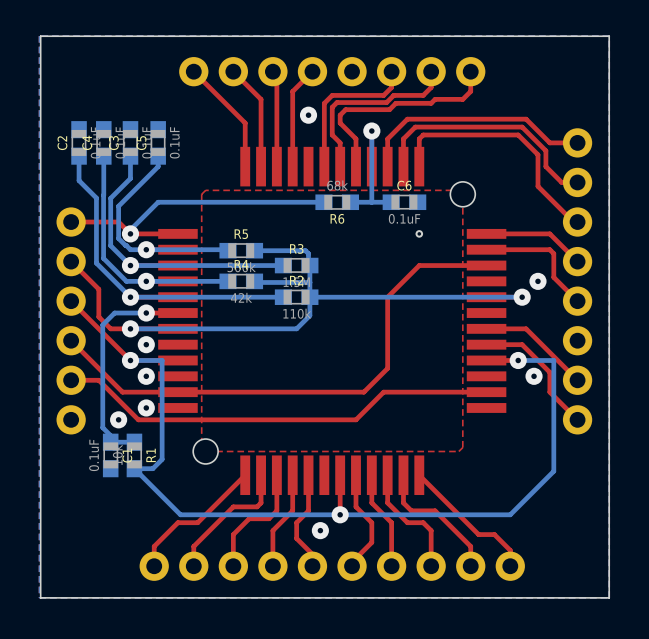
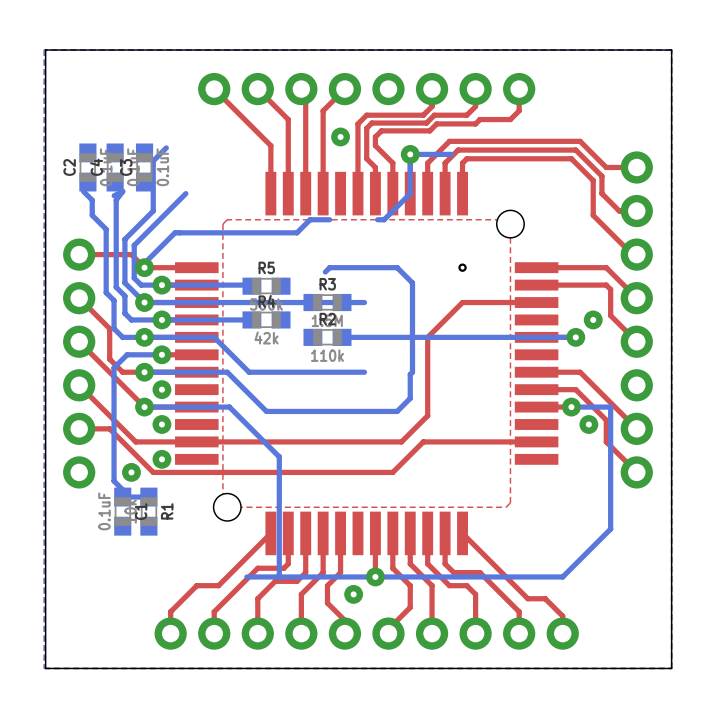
bottom track: none -> (451, 154) (410, 154)
C5: 0.1uF (158, 142) -> none
bottom track: (79, 156) (79, 180) (96, 198) (96, 263) (130, 297) -> (83, 191) (92, 200) (92, 215) (106, 229) (106, 292) (114, 300) (114, 328) (122, 337) (144, 337)
bottom track: (103, 156) (103, 195) -> none
bottom track: (130, 156) (130, 178) (110, 198) (110, 245) (112, 247) -> (166, 147) (153, 161) (153, 211) (124, 239) (124, 282)
bottom track: (158, 156) (158, 166) (118, 206) (118, 238) (130, 249) -> (185, 193) (134, 245) (134, 278) (141, 285) (144, 285)
bottom track: (371, 166) (371, 202) -> (410, 193) (384, 219) (377, 219)
bottom track: (103, 195) (103, 258) (126, 281) -> (114, 195) (122, 191) (116, 200) (116, 287) (124, 295) (124, 313) (131, 319) (140, 319)
bottom track: (323, 202) (268, 202) -> (329, 219) (310, 219) (297, 232)
R6: 68k (337, 202) -> none
bottom track: (391, 202) (350, 202) -> none
C6: 0.1uF (404, 202) -> none
bottom track: none -> (325, 272) (329, 267) (397, 267) (412, 282) (412, 372) (410, 374) (410, 398) (397, 411) (266, 411) (227, 372)
bottom track: (254, 250) (305, 250) (308, 253) (309, 315) (296, 328) -> (364, 372) (327, 372)
bottom track: none -> (364, 302) (312, 302)
bottom track: (254, 281) (309, 282) -> none
bottom track: (283, 297) (193, 297) -> none
bottom track: (225, 328) (205, 328) -> (249, 372) (214, 337)
bottom track: (162, 360) (162, 459) (152, 468) (134, 468) (180, 514) (223, 514) -> (179, 407) (229, 407) (279, 456) (279, 576)

